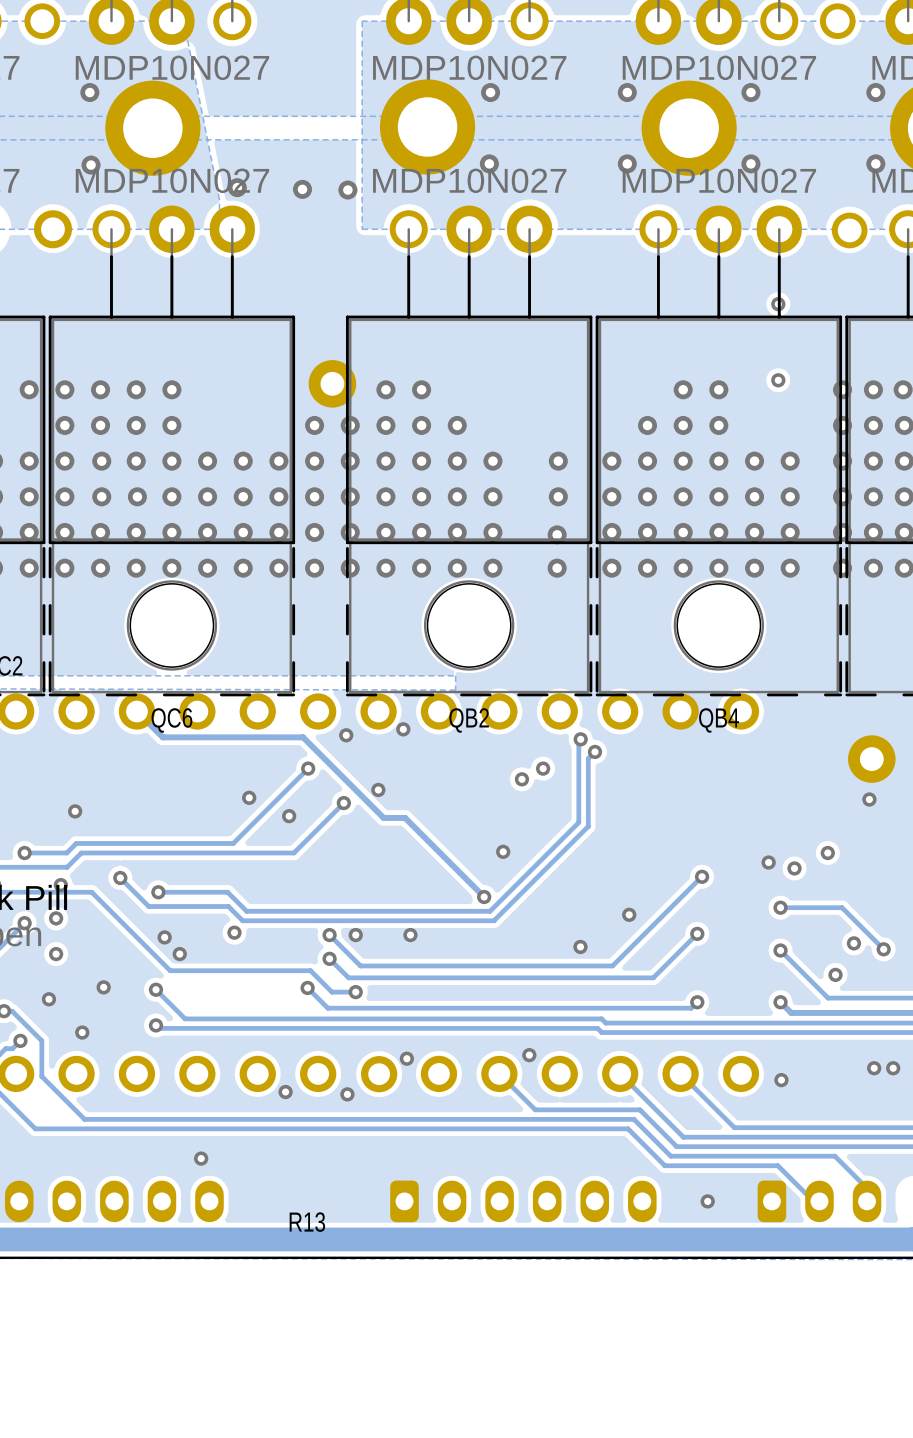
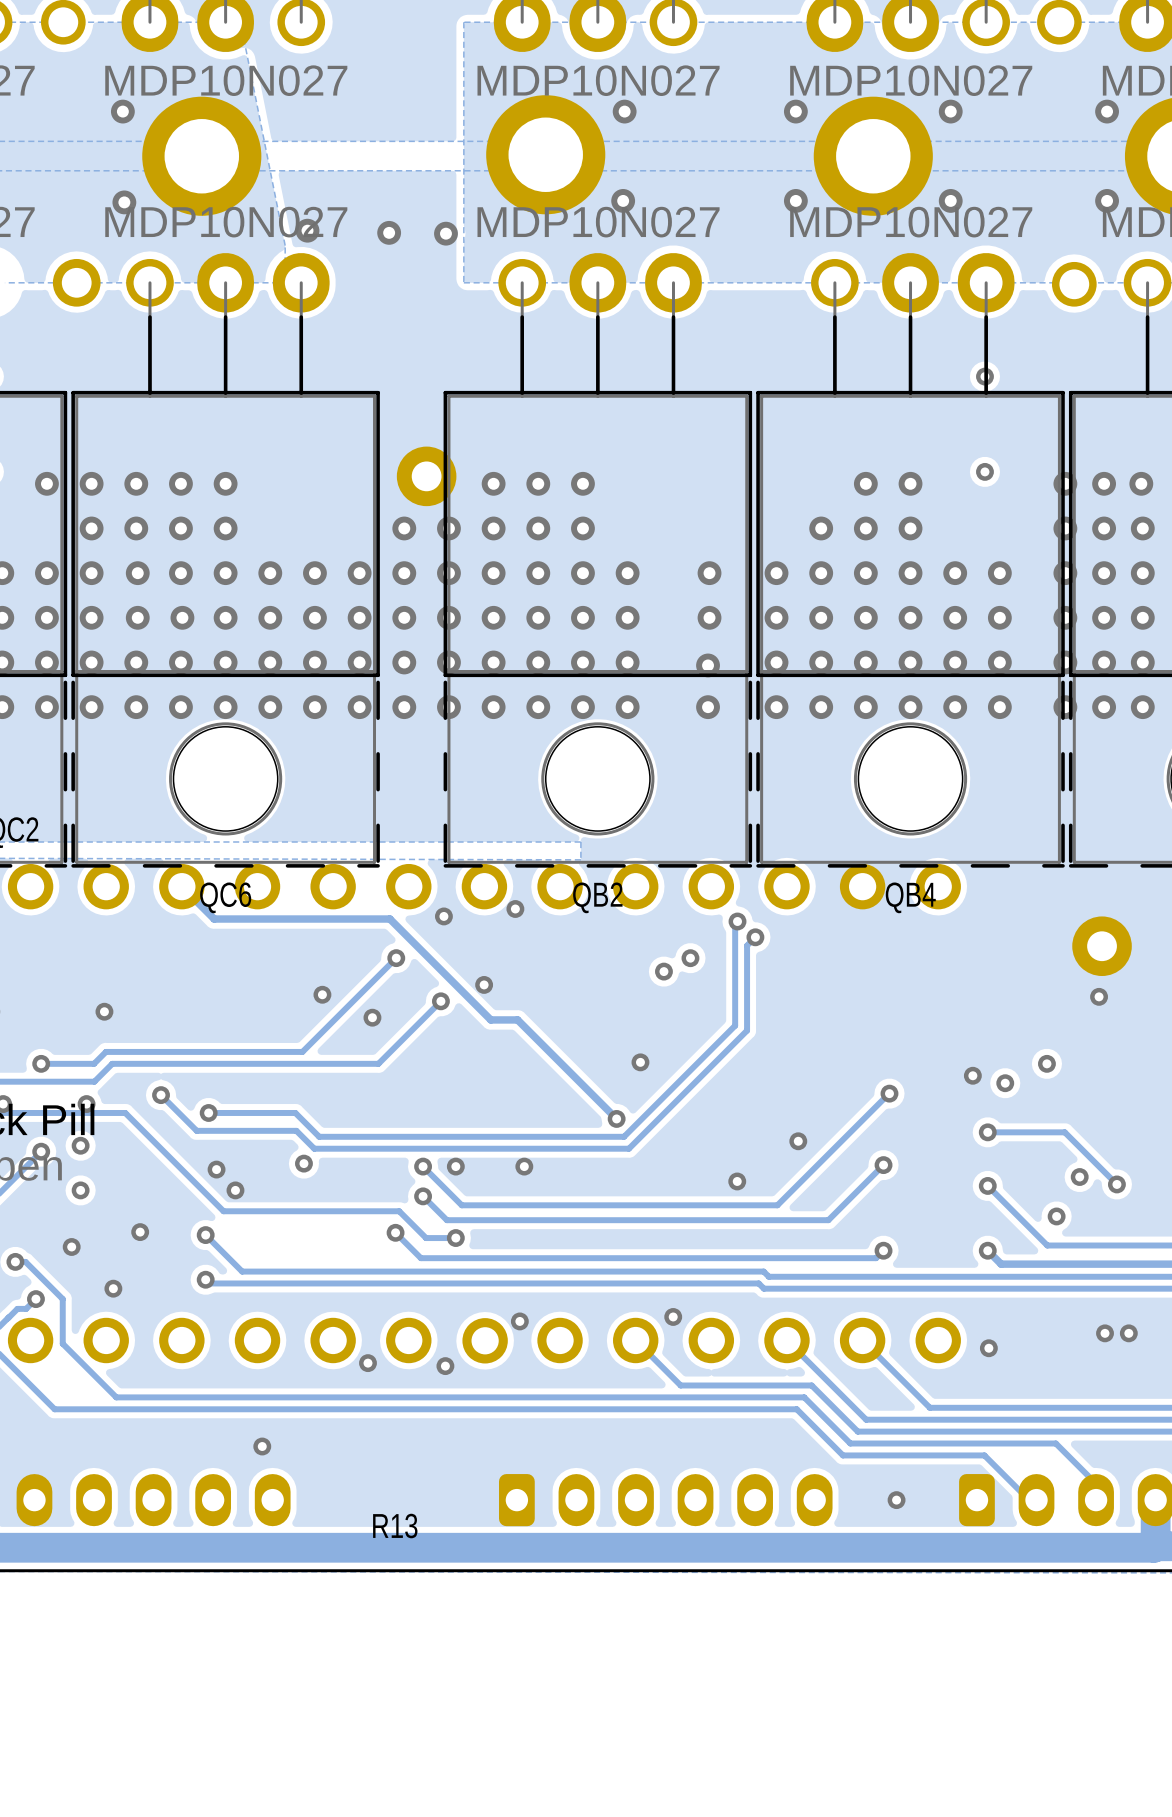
via: none -> (582, 483)

